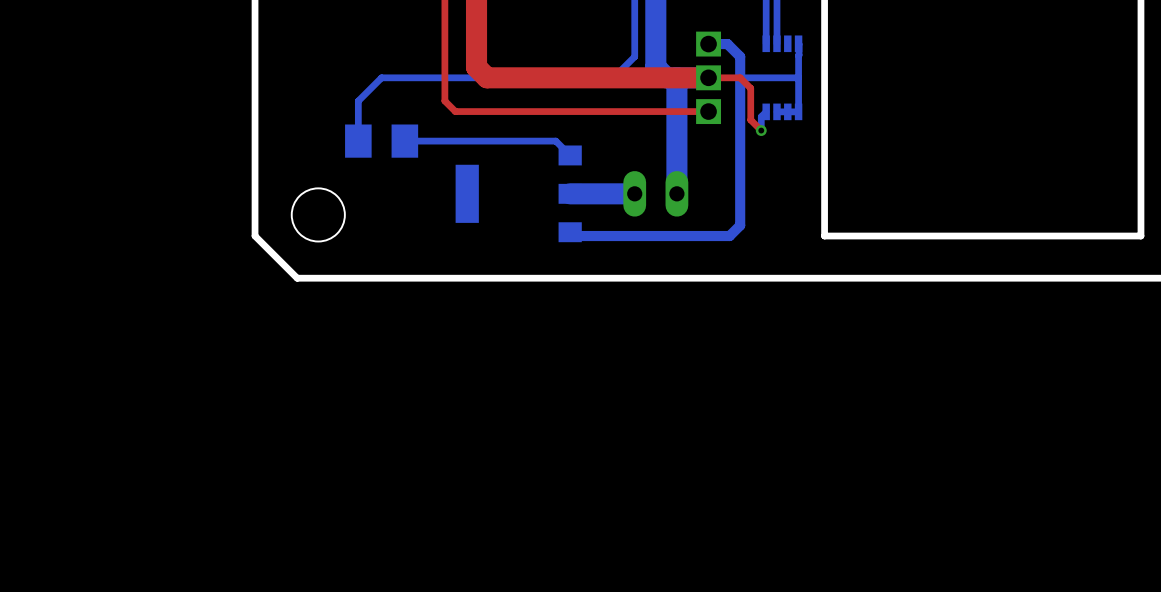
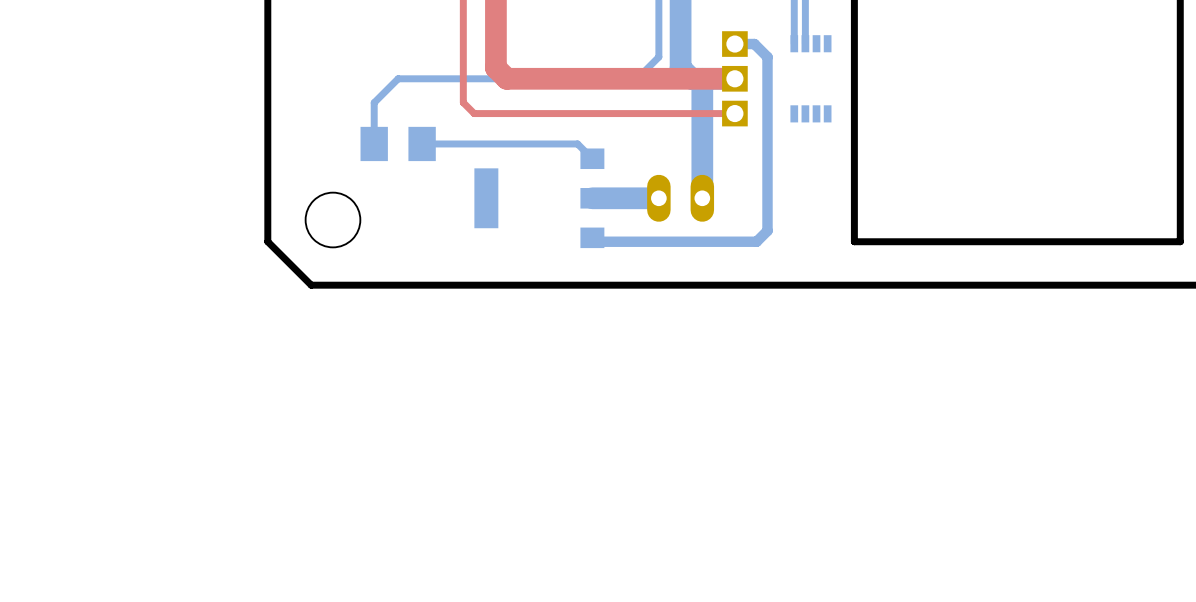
bottom track: (798, 43) (798, 111) (776, 111) -> none
top track: (708, 77) (740, 77) (750, 88) (750, 120) (761, 130) -> none
bottom track: (740, 77) (798, 77) -> none
bottom track: (766, 111) (761, 116) (761, 130) -> none
via: (761, 130) -> none

